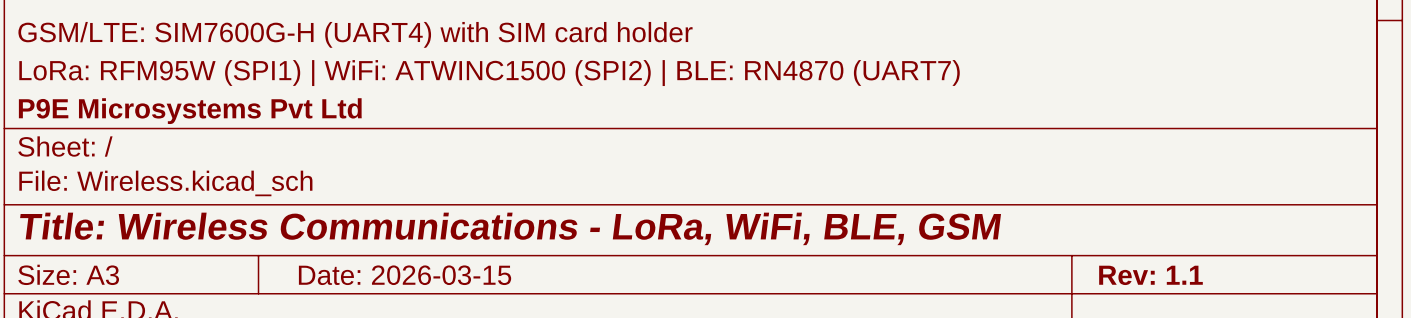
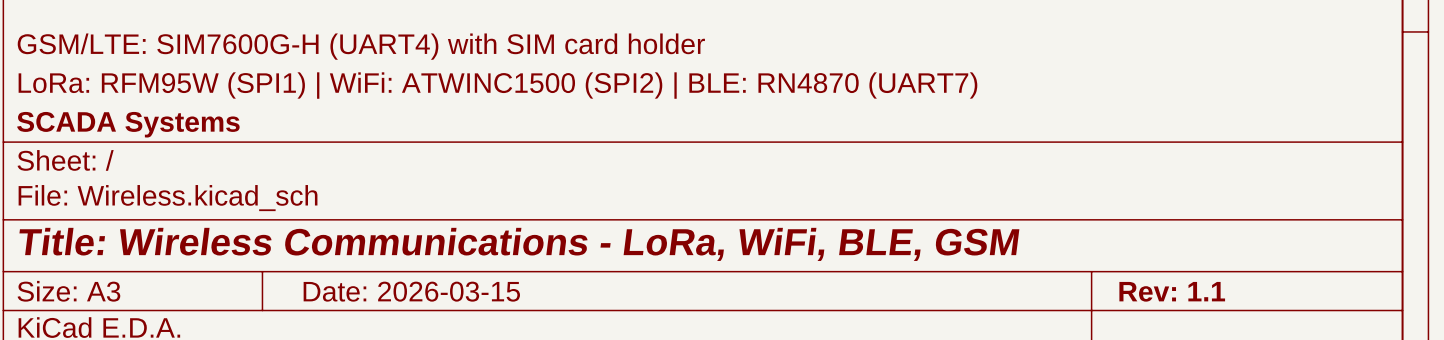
title block: P9E Microsystems Pvt Ltd (190, 111) -> SCADA Systems (128, 124)

